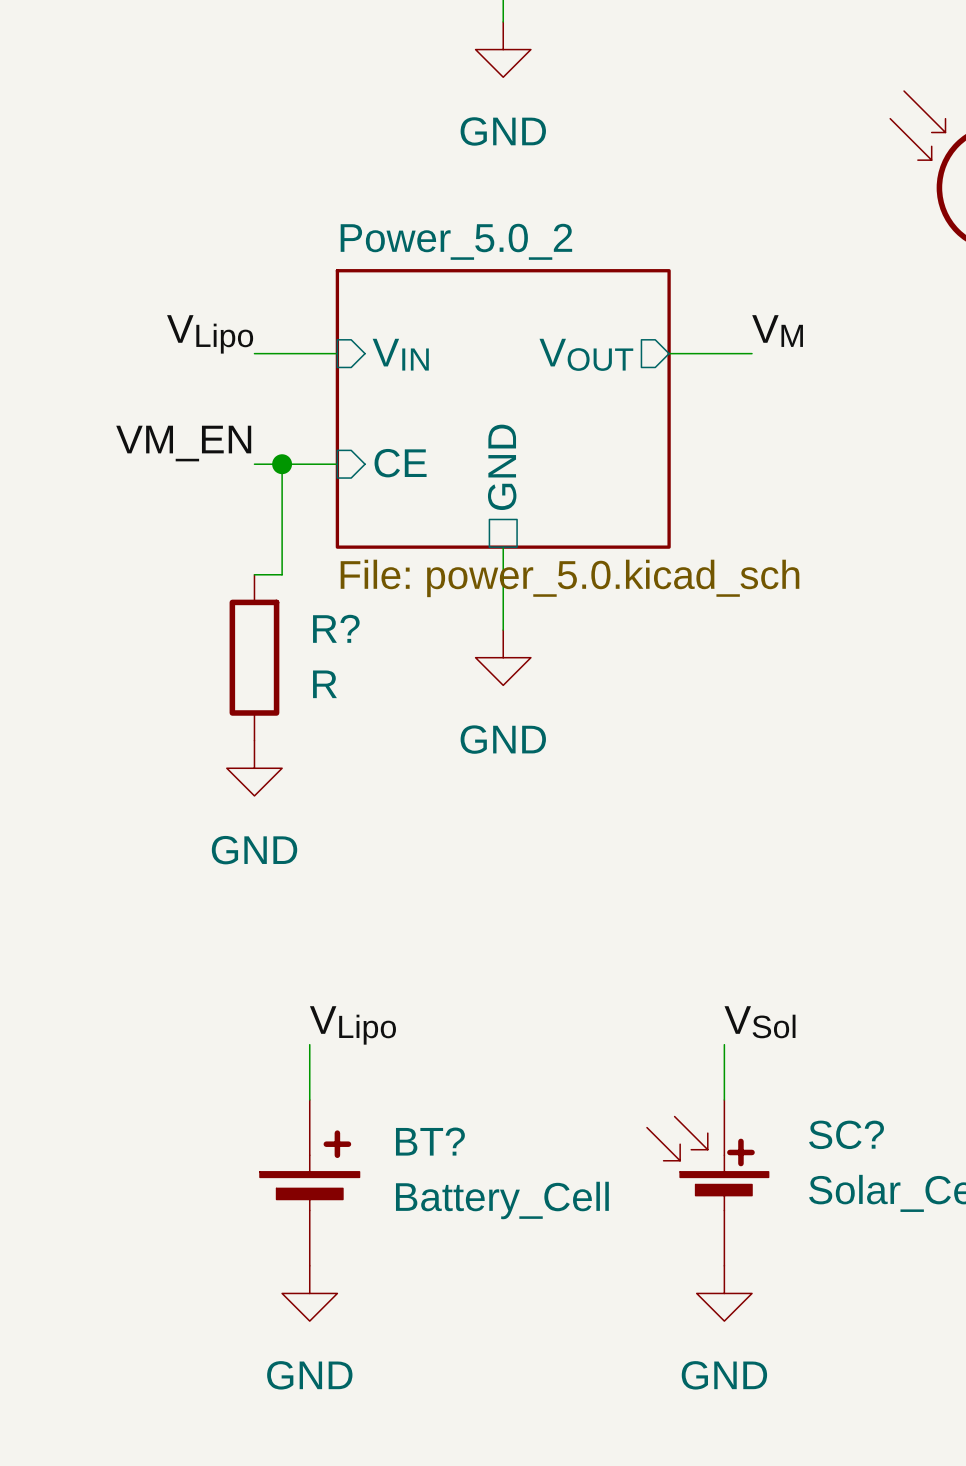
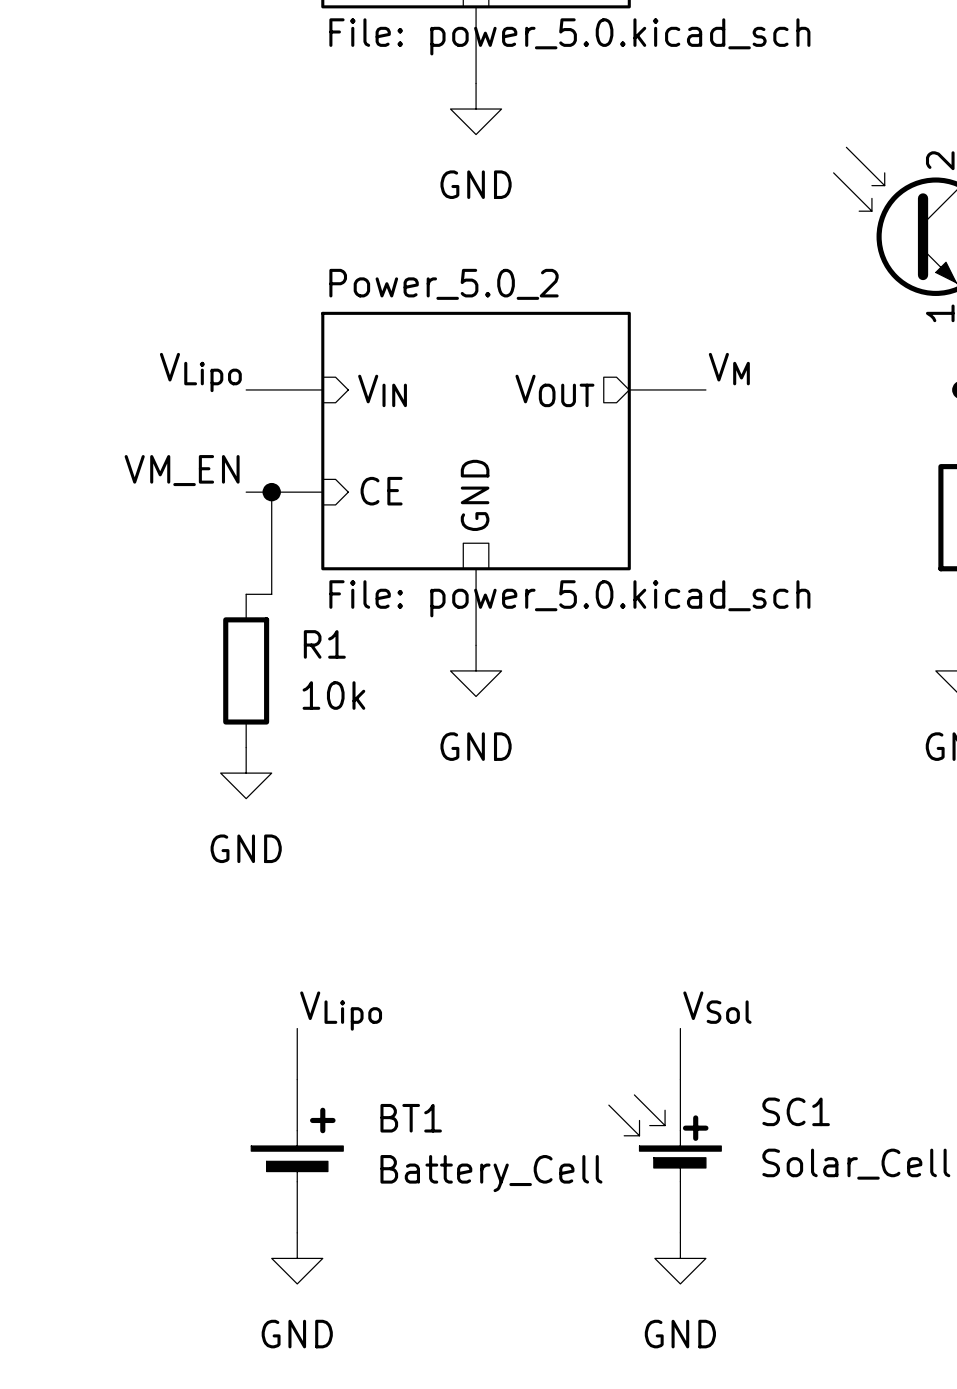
R? name: R? (336, 628) -> R1 (324, 644)
R? value: R (324, 684) -> 10k (333, 695)
SC? name: SC? (846, 1134) -> SC1 (796, 1111)
BT? name: BT? (430, 1141) -> BT1 (411, 1118)

